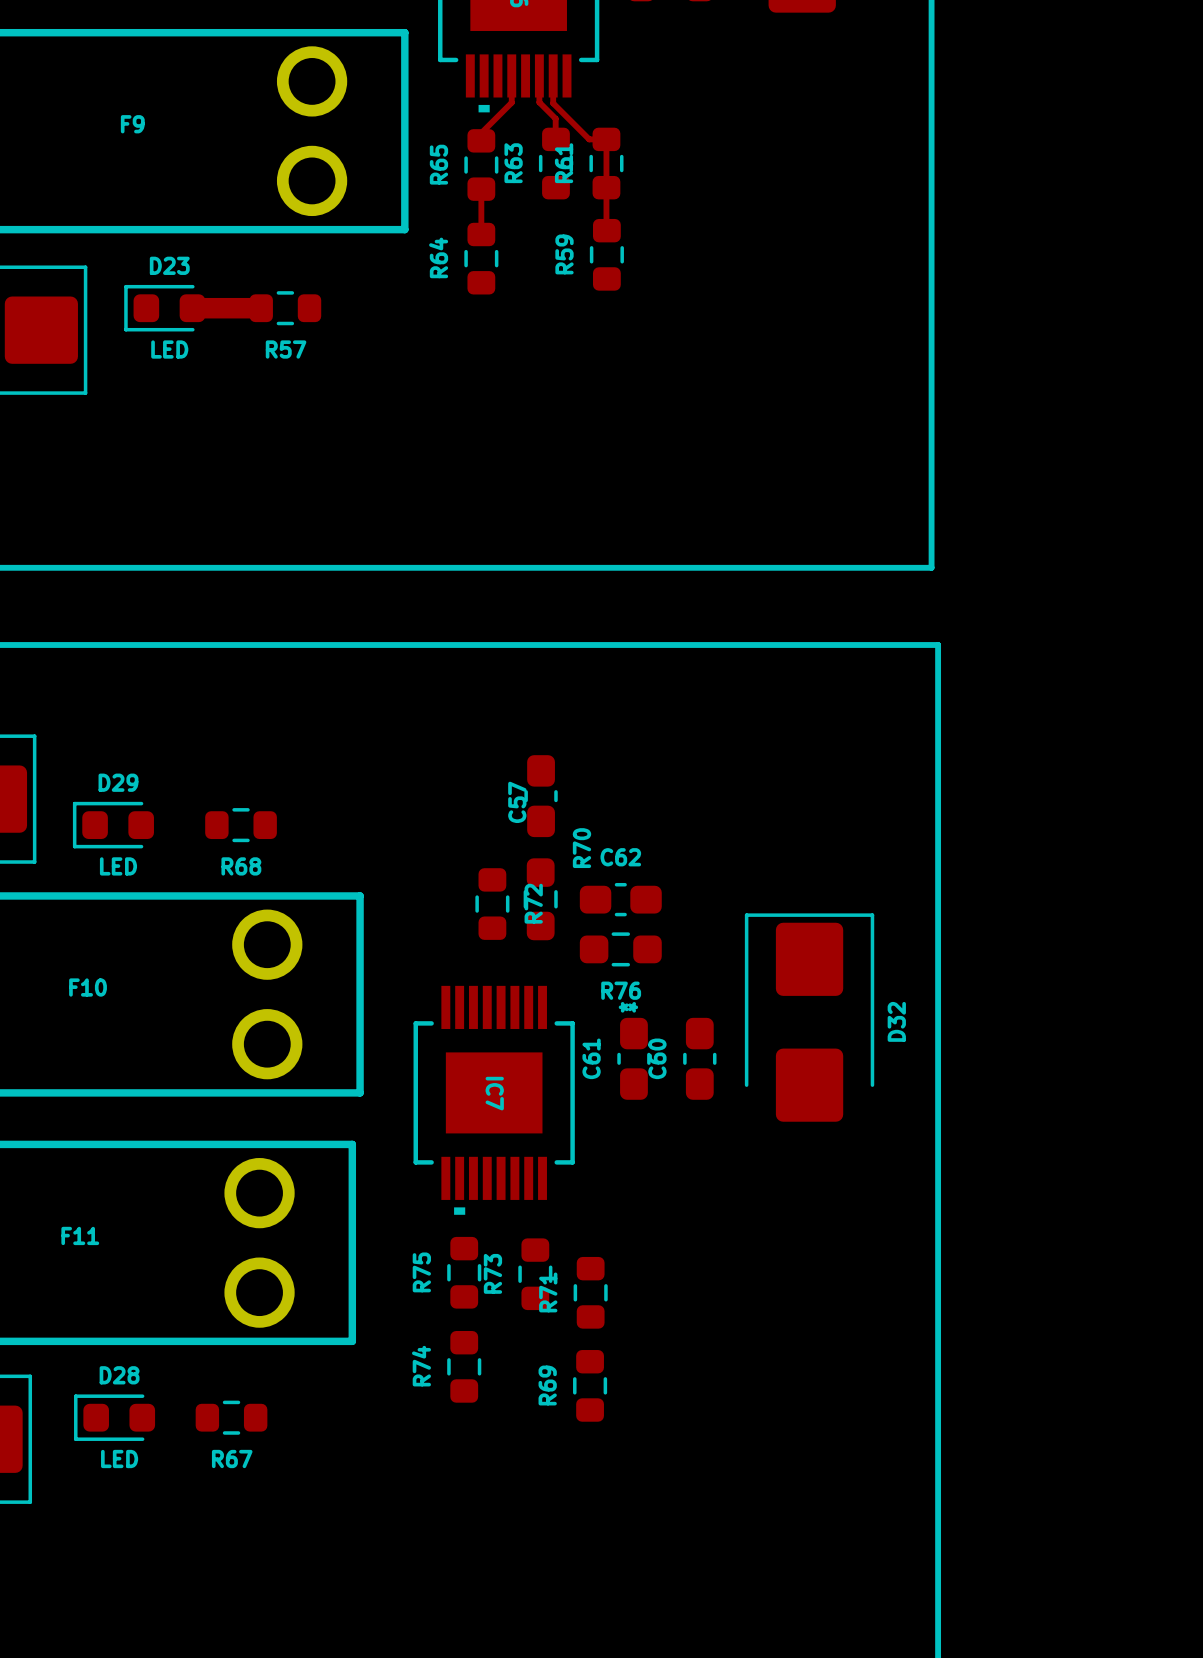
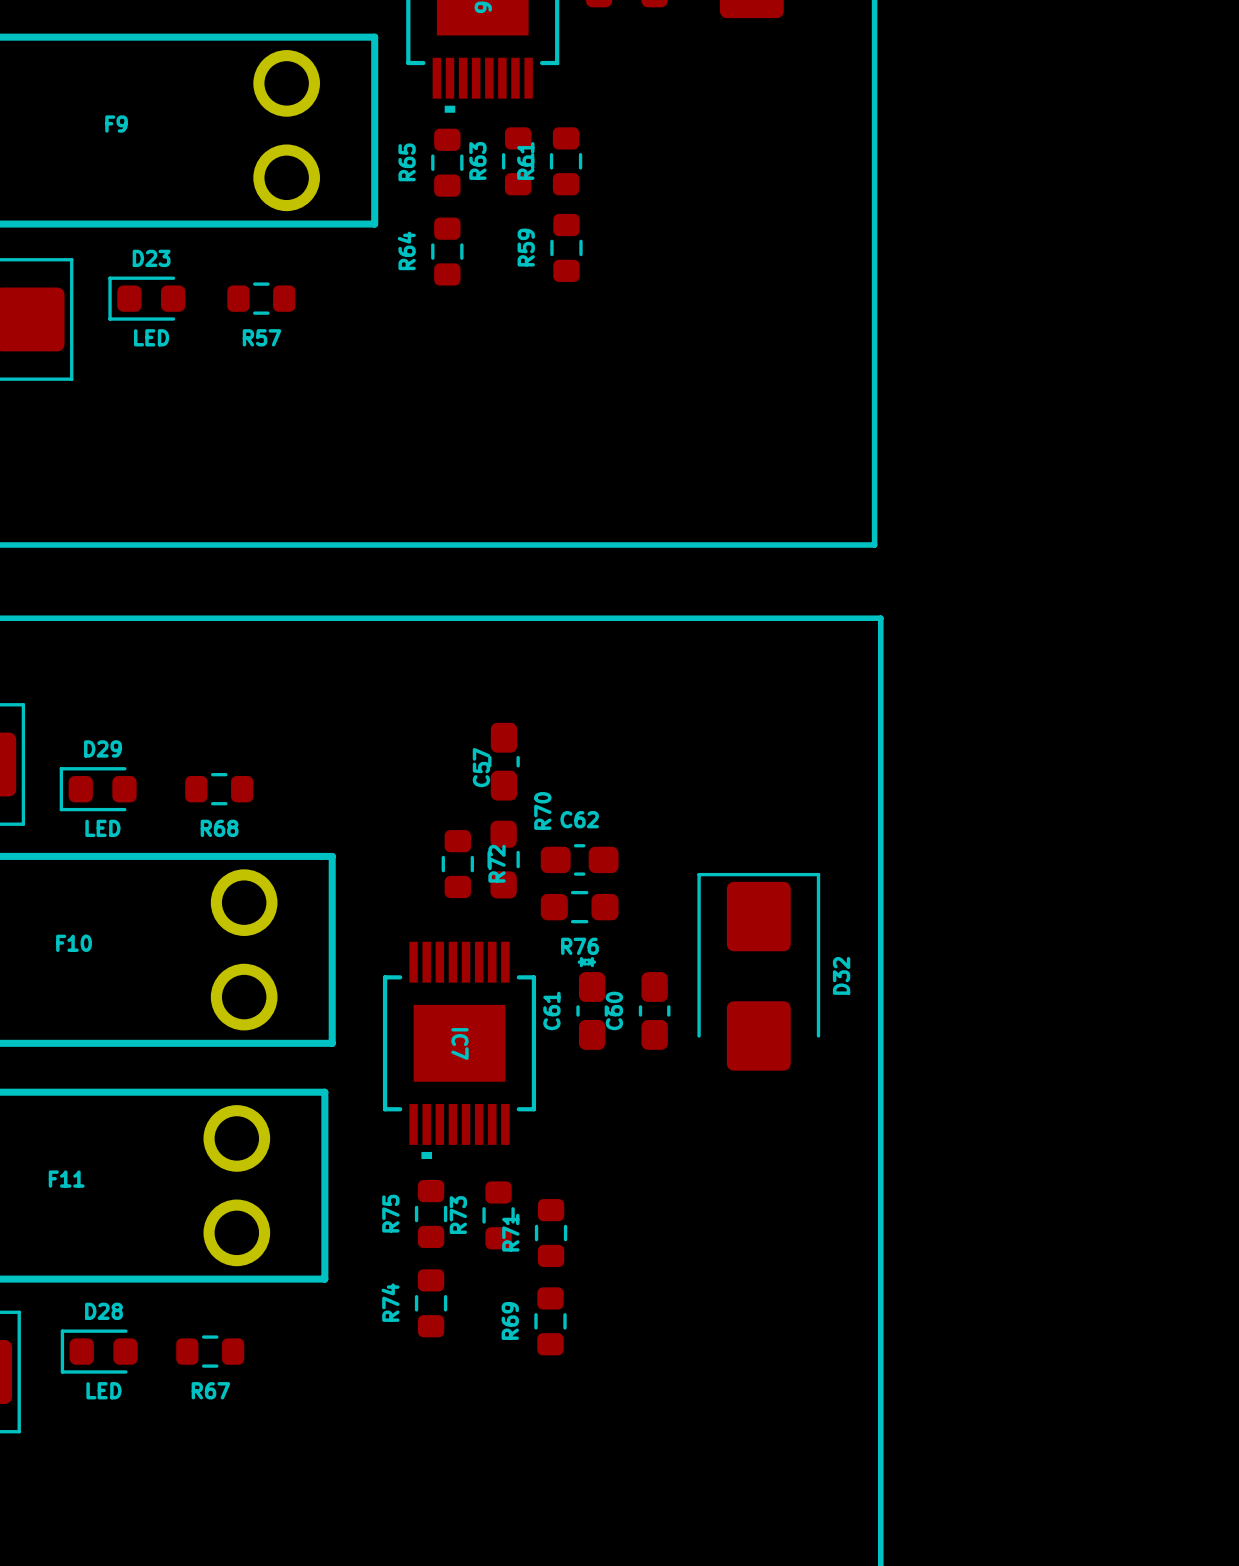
track: (511, 75) (511, 102) (481, 133) (481, 140) -> none
track: (539, 75) (539, 102) (555, 118) (555, 139) -> none
track: (553, 75) (553, 103) (589, 139) (606, 139) (606, 230) -> none
track: (481, 189) (481, 234) -> none
track: (192, 308) (261, 308) -> none

